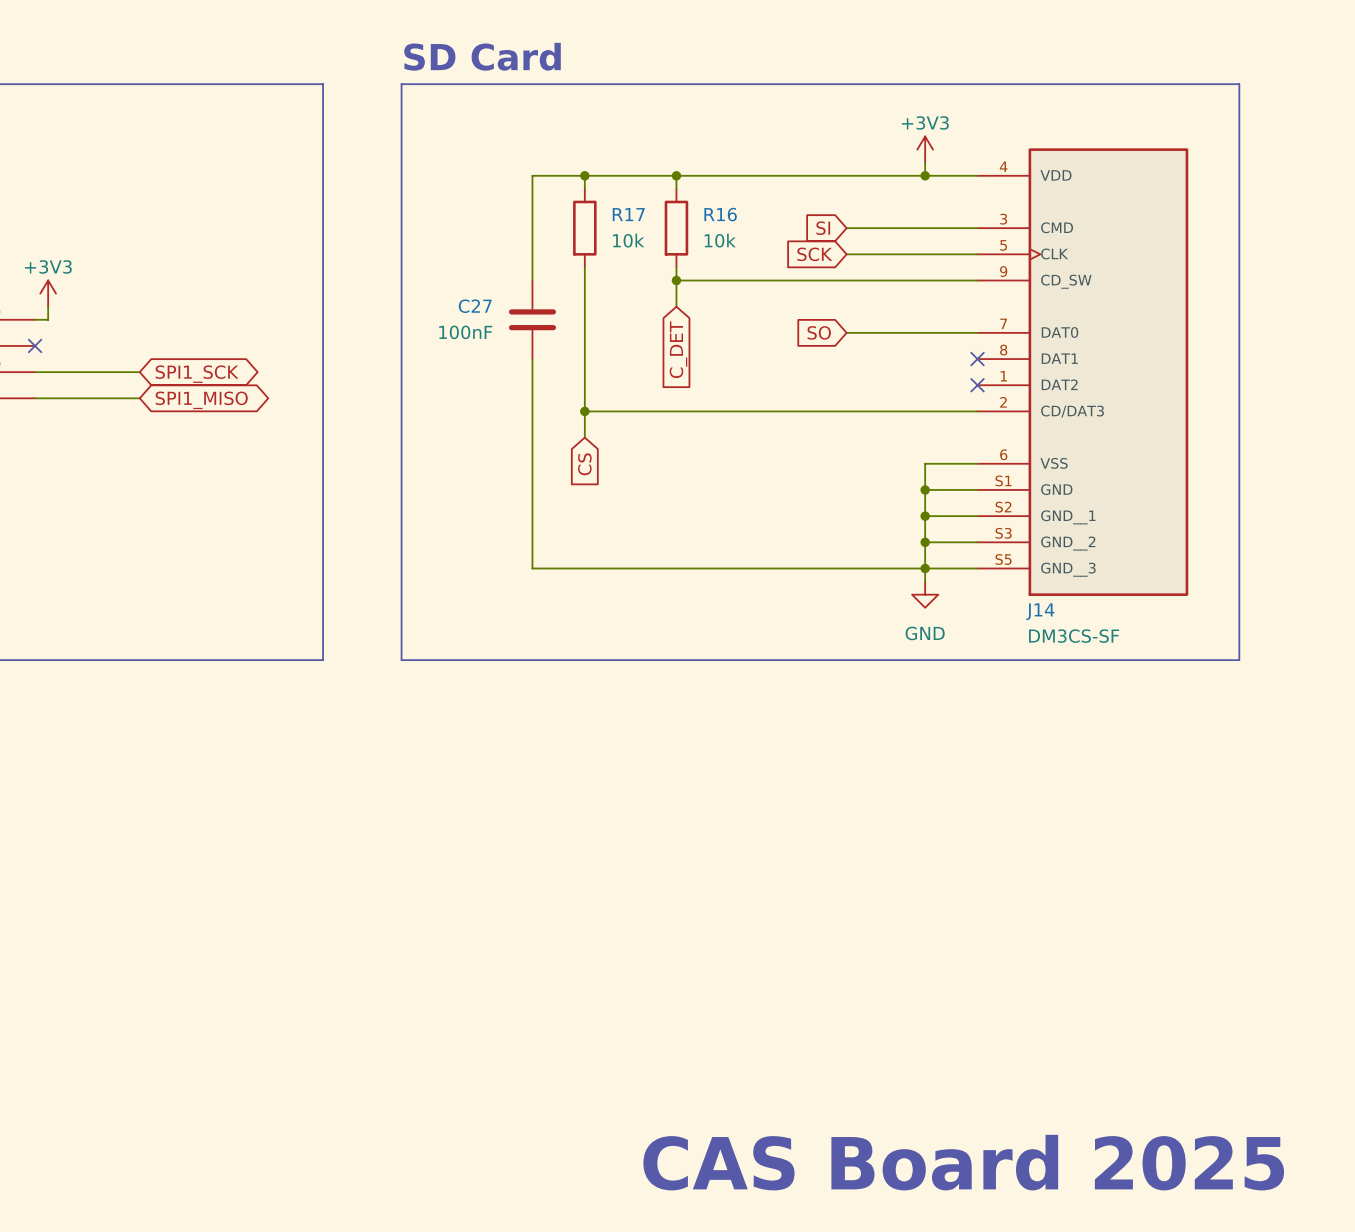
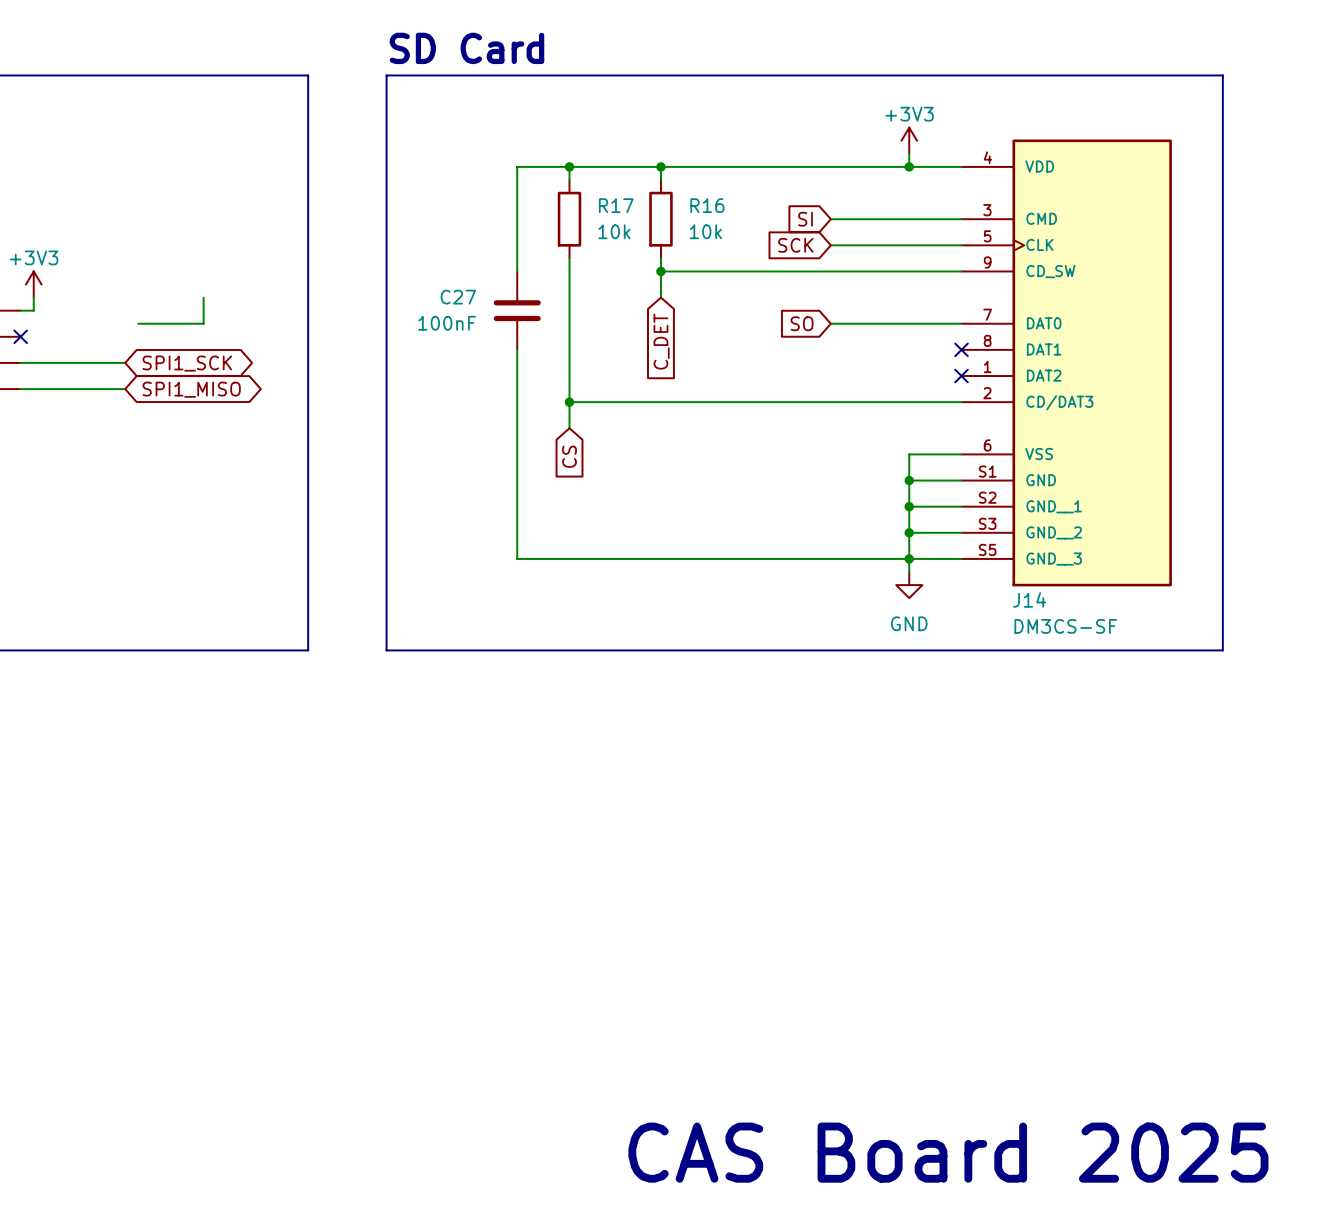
wire: none -> (203, 297) (203, 323) (138, 323)

